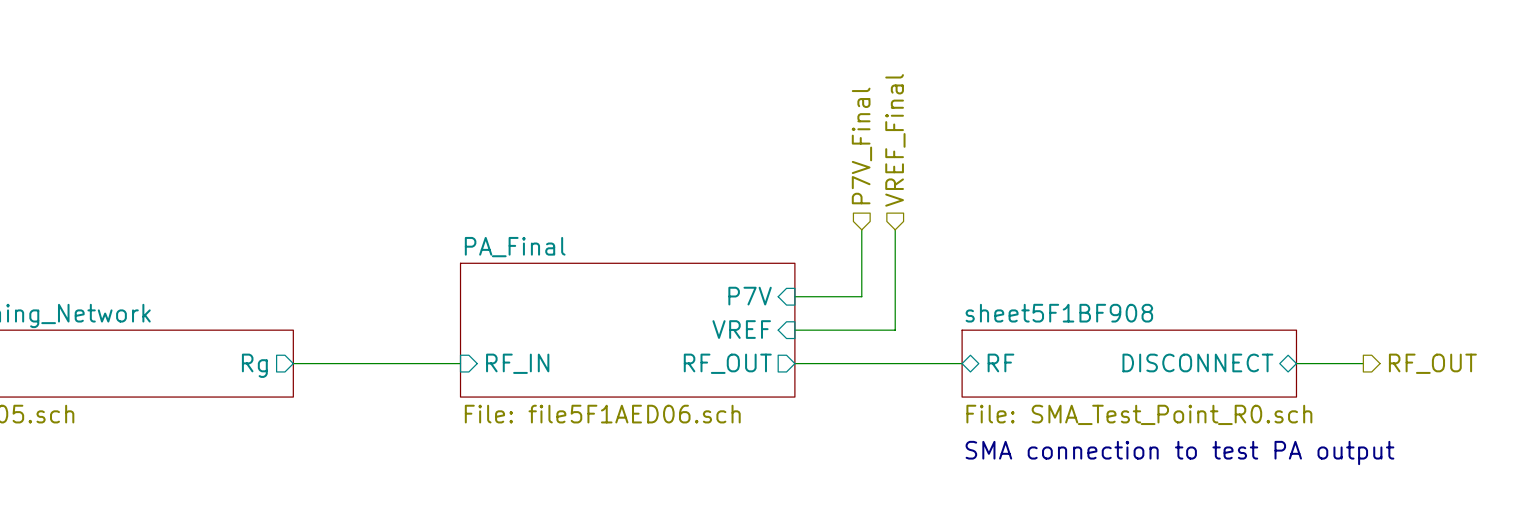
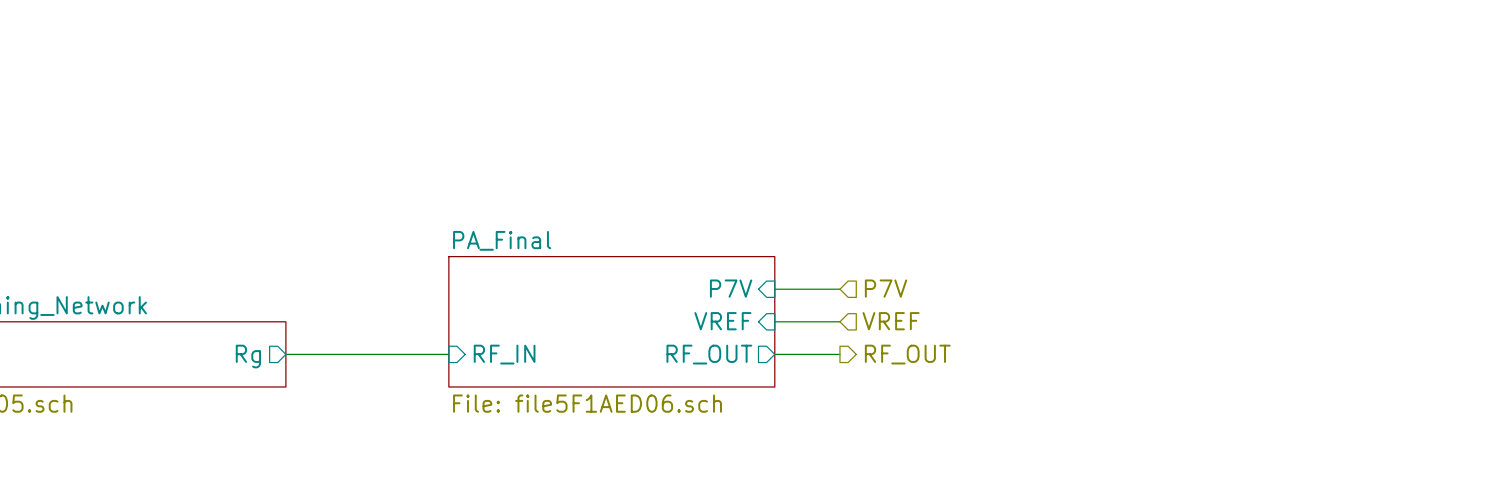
hierarchical label: VREF_Final (895, 140) -> none
hierarchical label: P7V_Final (861, 145) -> none
wire: (861, 229) (861, 296) -> none
wire: (895, 229) (895, 330) (861, 330) -> none
hierarchical label: none -> P7V (886, 288)
hierarchical label: none -> VREF (891, 321)
sheet pin: RF (1000, 362) -> none
sheet pin: DISCONNECT (1197, 362) -> none
wire: (861, 363) (962, 363) -> none
hierarchical label: none -> RF_OUT (907, 354)
sheet sheet5F1BF908: File: SMA_Test_Point_R0.sch (1129, 363) -> none
wire: (1296, 363) (1363, 363) -> none
hierarchical label: RF_OUT (1432, 363) -> none
text: SMA connection to test PA output (1179, 453) -> none

